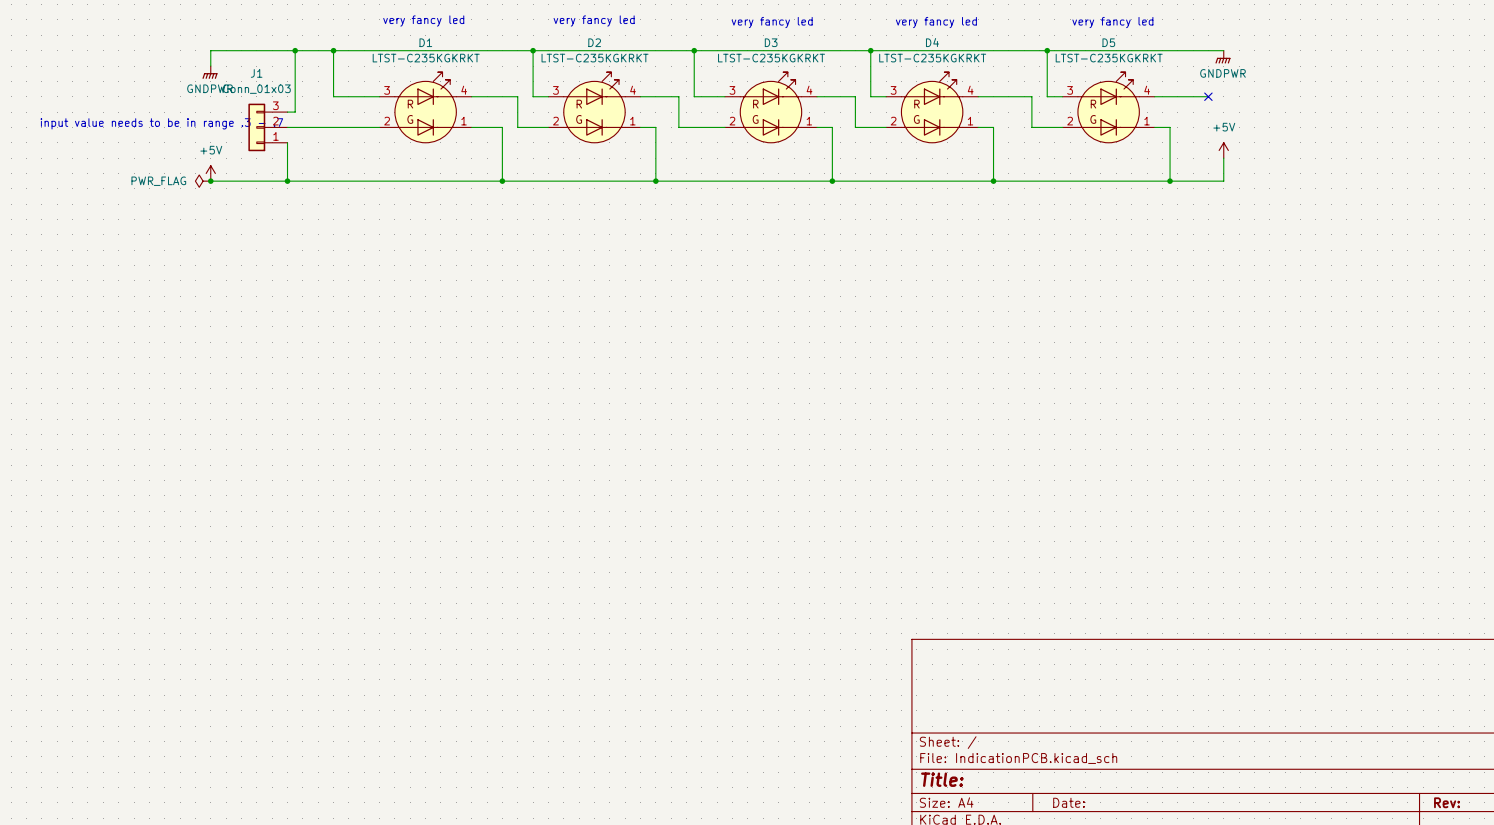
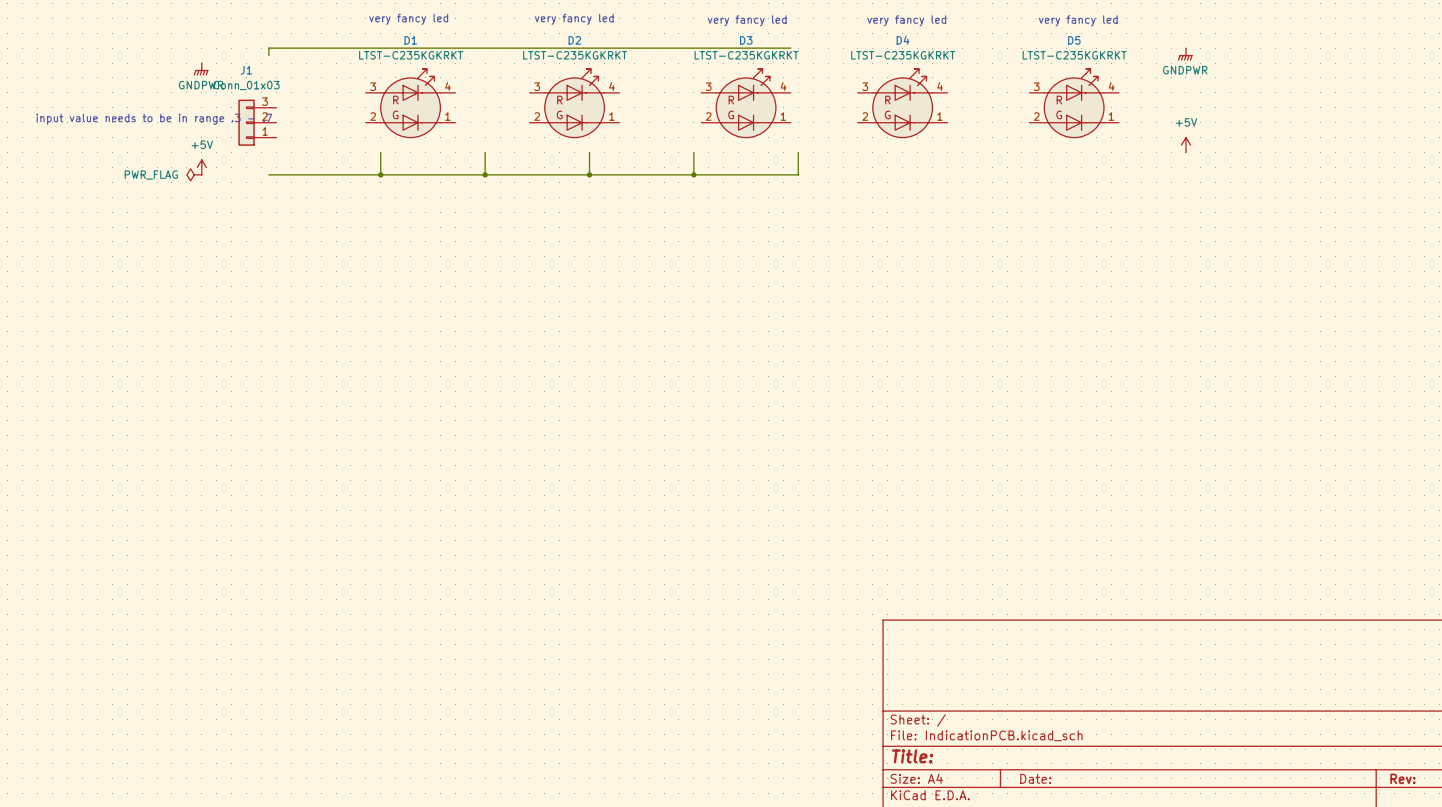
wire: (279, 50) (210, 50) (210, 66) -> (268, 48) (268, 55)
wire: (295, 50) (295, 112) (287, 112) -> none
junction: (295, 50) -> none
wire: (333, 50) (333, 96) (379, 96) -> none
junction: (333, 50) -> none
wire: (533, 50) (533, 96) (548, 96) -> none
junction: (533, 50) -> none
wire: (694, 50) (694, 96) (724, 96) -> none
junction: (694, 50) -> none
wire: (817, 50) (1223, 50) -> none
wire: (870, 50) (870, 96) (886, 96) -> none
junction: (870, 50) -> none
wire: (1047, 50) (1047, 96) (1062, 96) -> none
junction: (1047, 50) -> none
wire: (471, 96) (517, 96) (517, 127) (548, 127) -> none
wire: (640, 96) (678, 96) (678, 127) (724, 127) -> none
wire: (817, 96) (855, 96) (855, 127) (886, 127) -> none
wire: (978, 96) (1031, 96) (1031, 127) (1062, 127) -> none
wire: (1154, 96) (1208, 96) -> none
no-connect mark: (1208, 96) -> none
wire: (287, 127) (379, 127) -> none
wire: (471, 127) (502, 127) (502, 158) -> none
wire: (640, 127) (655, 127) (655, 181) -> none
wire: (817, 127) (832, 127) (832, 181) -> none
wire: (978, 127) (993, 127) (993, 181) -> none
wire: (1154, 127) (1170, 127) (1170, 181) -> none
wire: (287, 142) (287, 181) -> none
wire: none -> (380, 152) (380, 174)
wire: none -> (589, 152) (589, 174)
wire: none -> (693, 152) (693, 174)
wire: (1223, 158) (1223, 181) (824, 181) -> (798, 152) (798, 174)
wire: (210, 181) (279, 181) -> none
junction: (210, 181) -> none
junction: (287, 181) -> none
junction: none -> (380, 174)
junction: none -> (589, 174)
junction: (655, 181) -> none
junction: none -> (693, 174)
junction: (832, 181) -> none
junction: (993, 181) -> none
junction: (1170, 181) -> none

